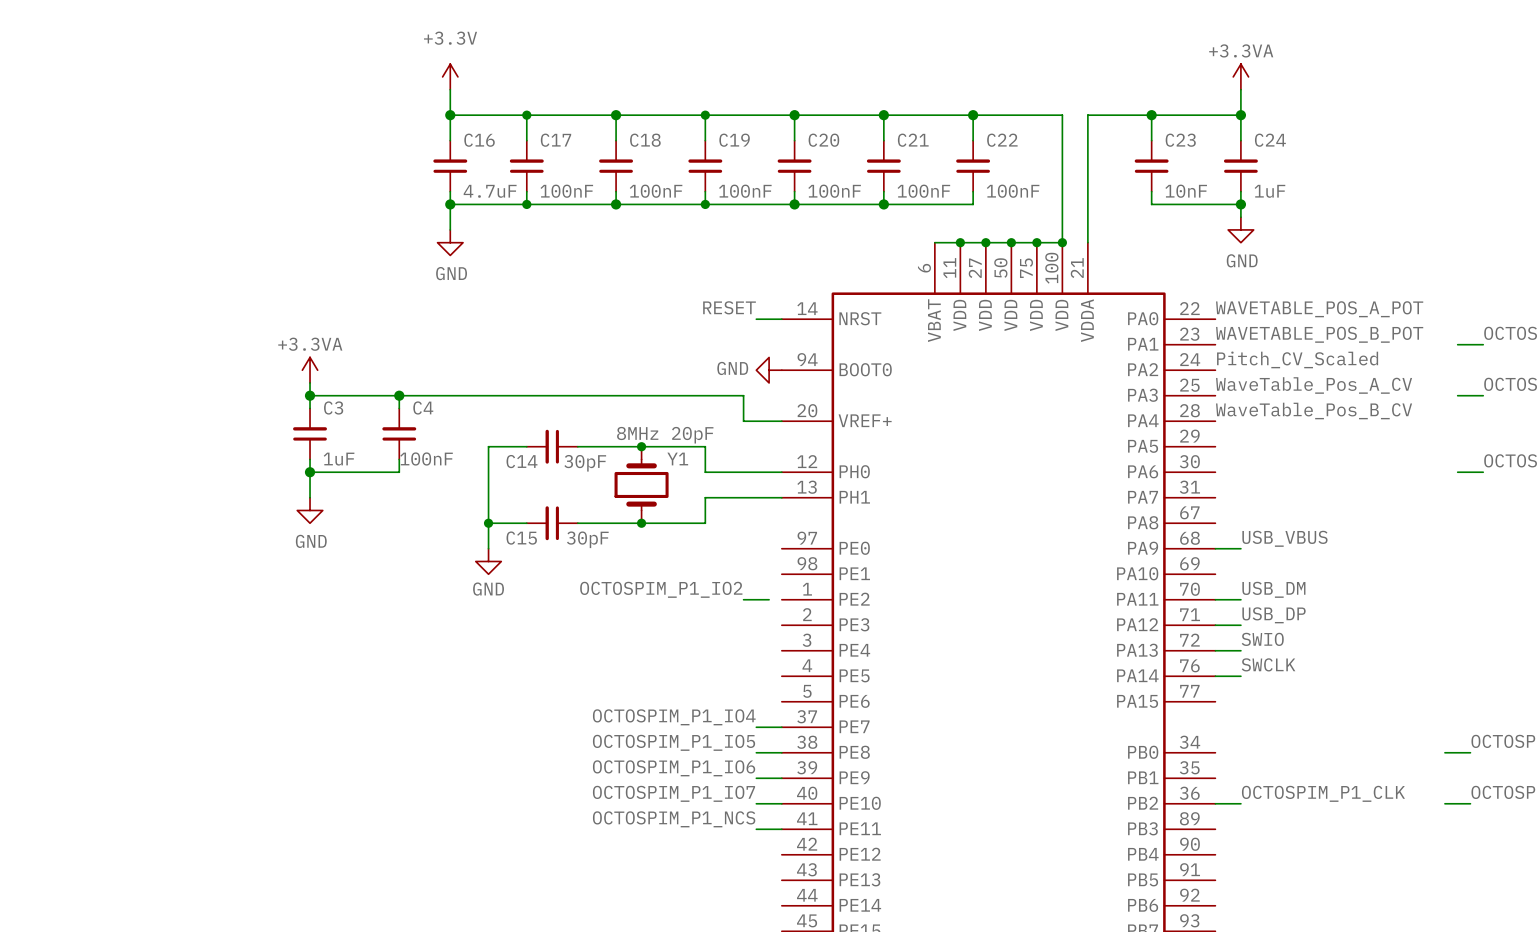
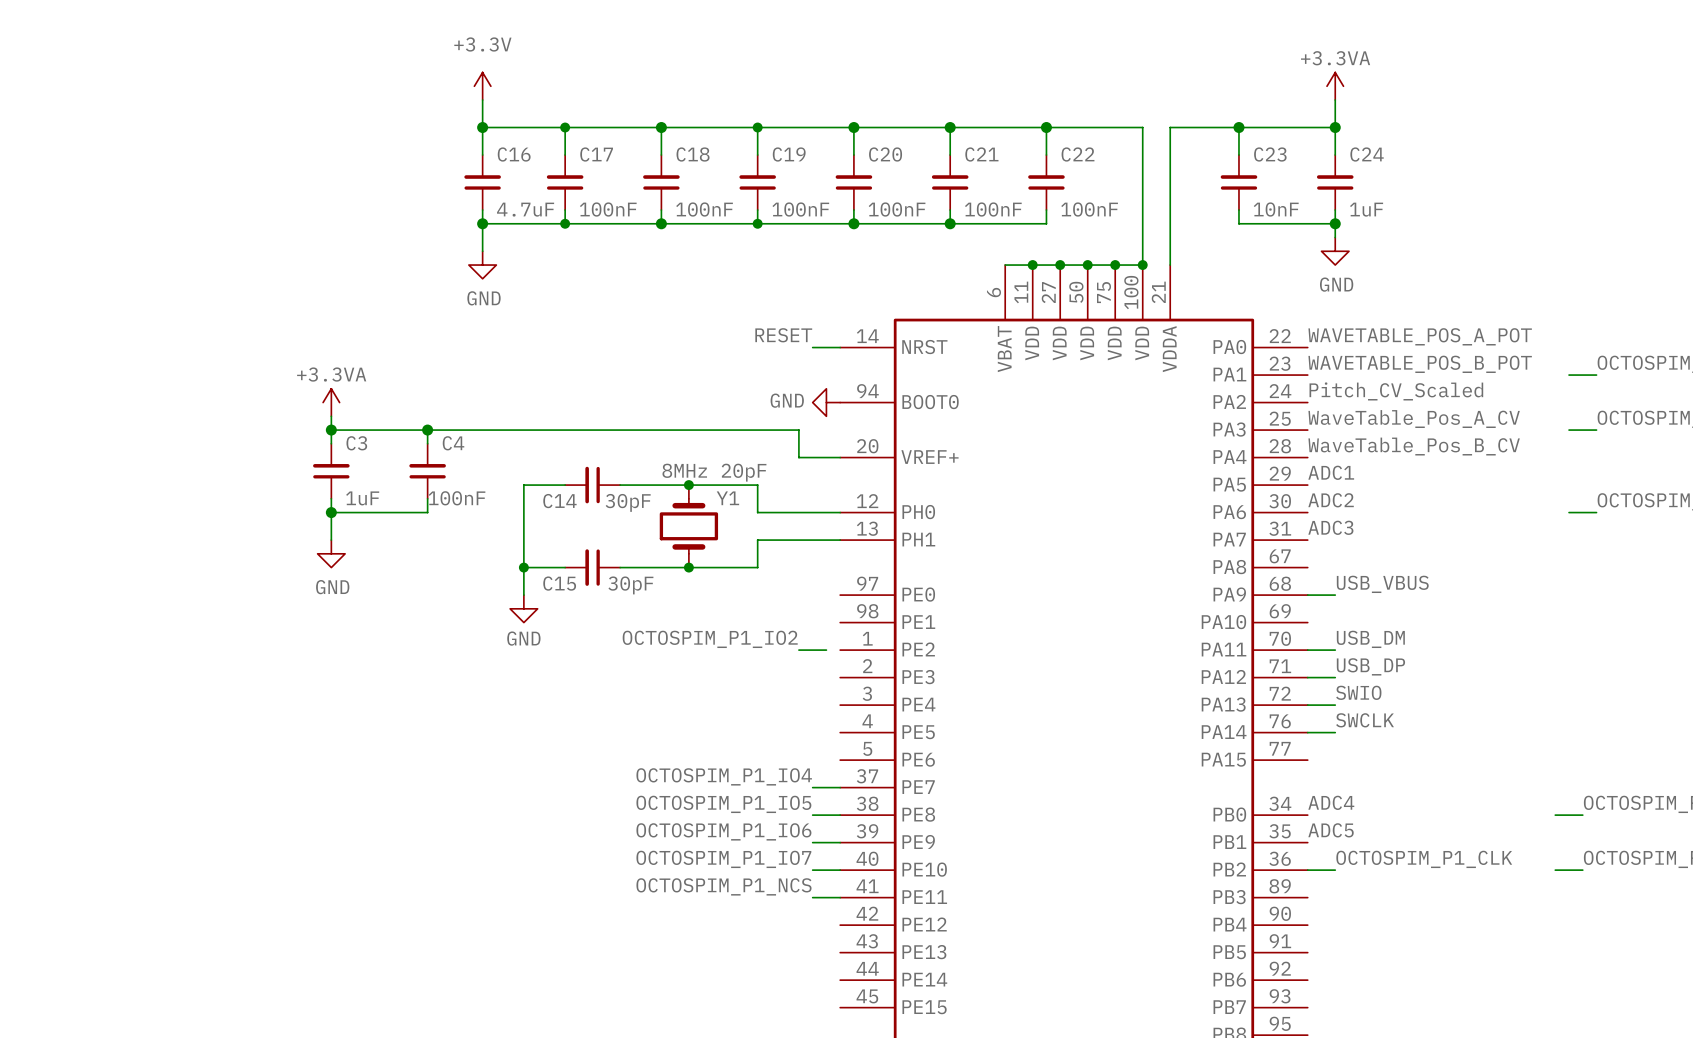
label: none -> ADC1 (1331, 472)
label: none -> ADC2 (1331, 500)
label: none -> ADC3 (1330, 527)
label: none -> ADC4 (1331, 802)
label: none -> ADC5 (1331, 830)

